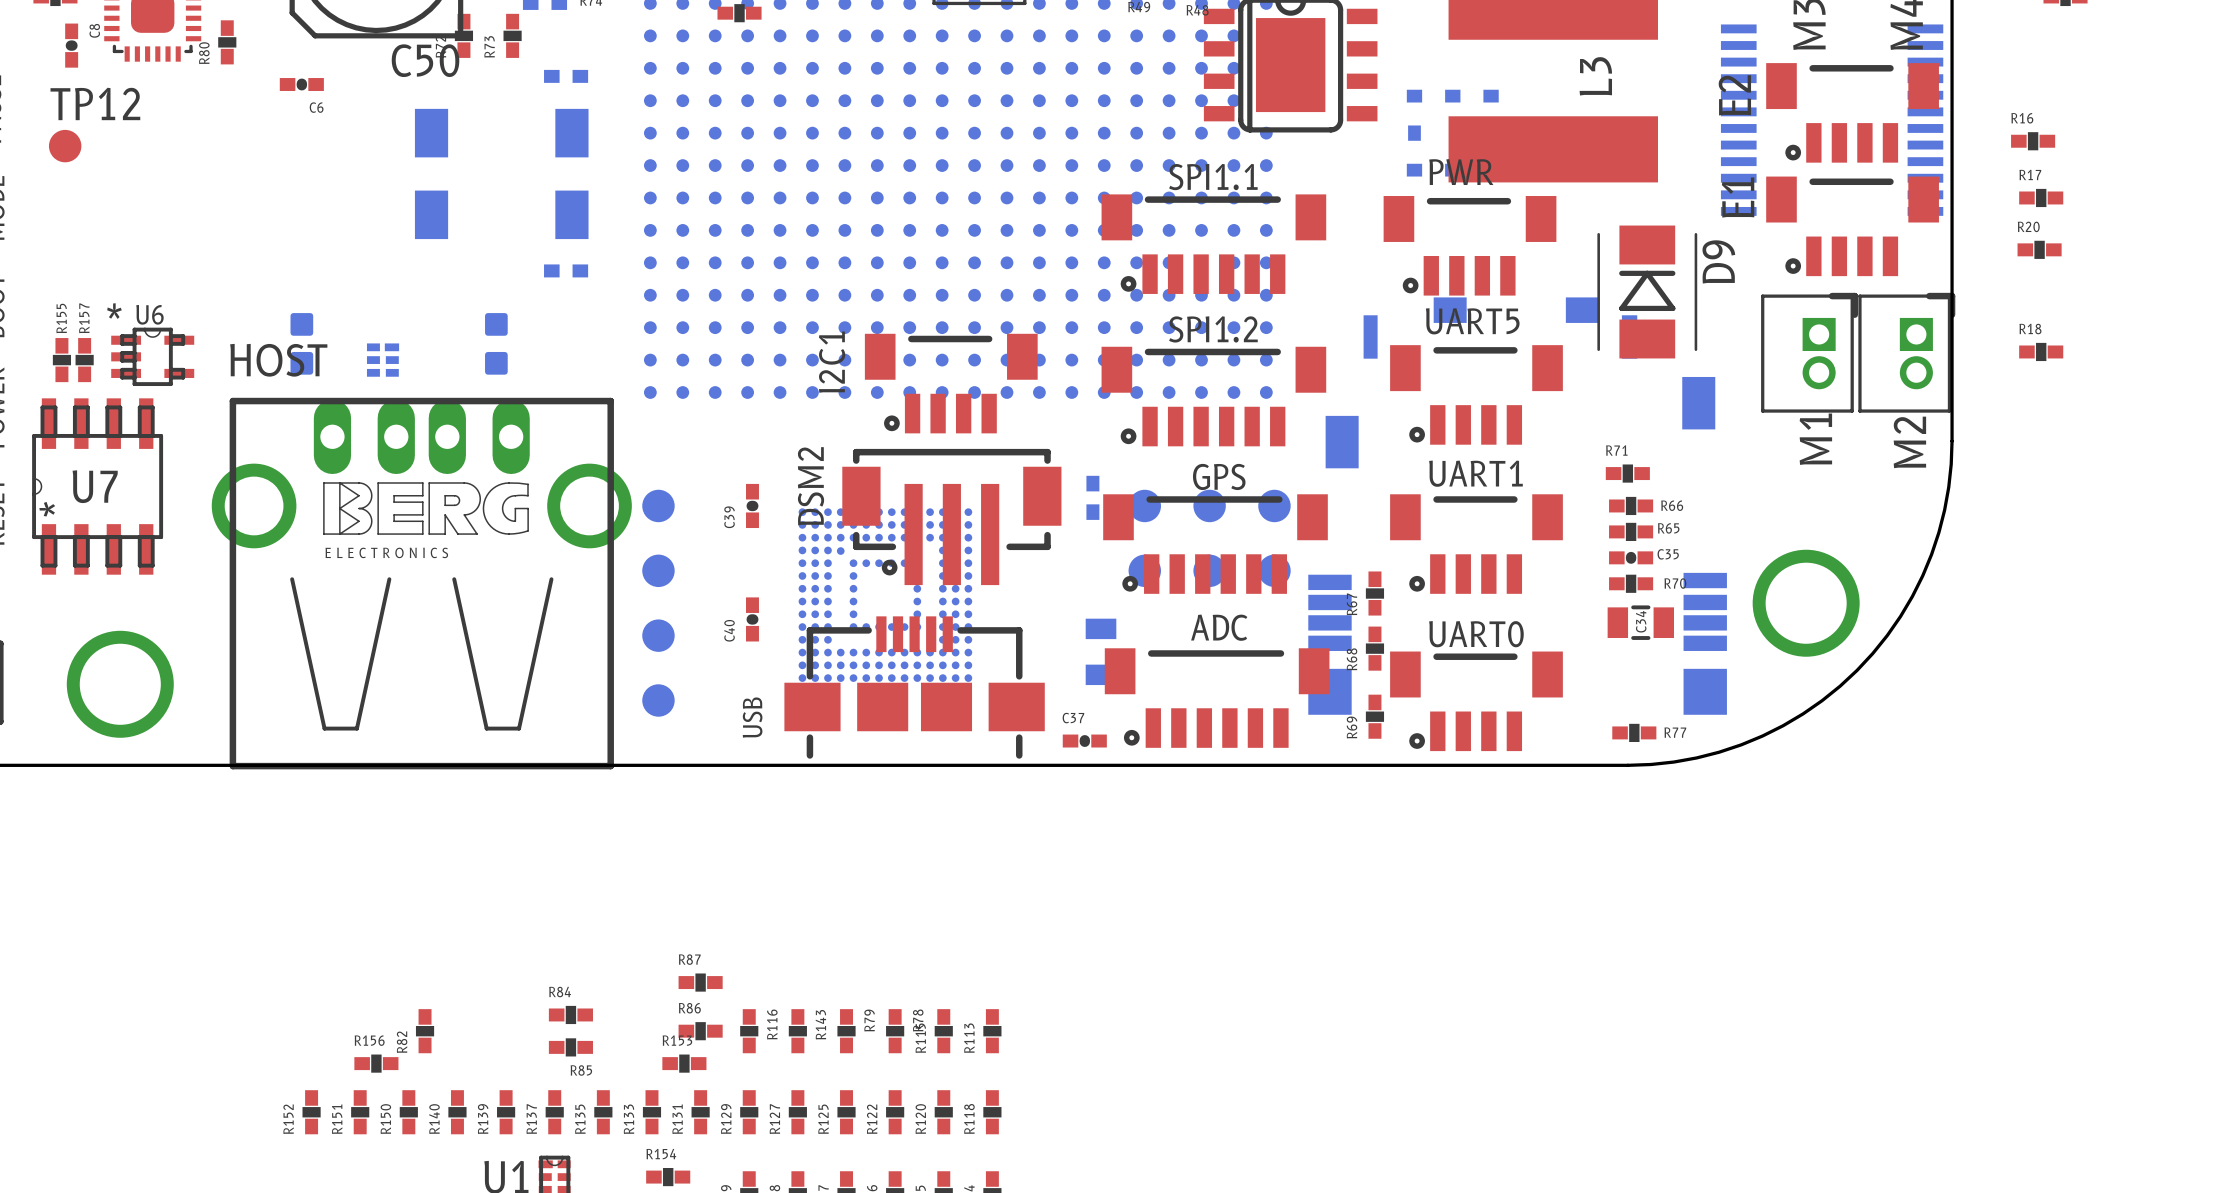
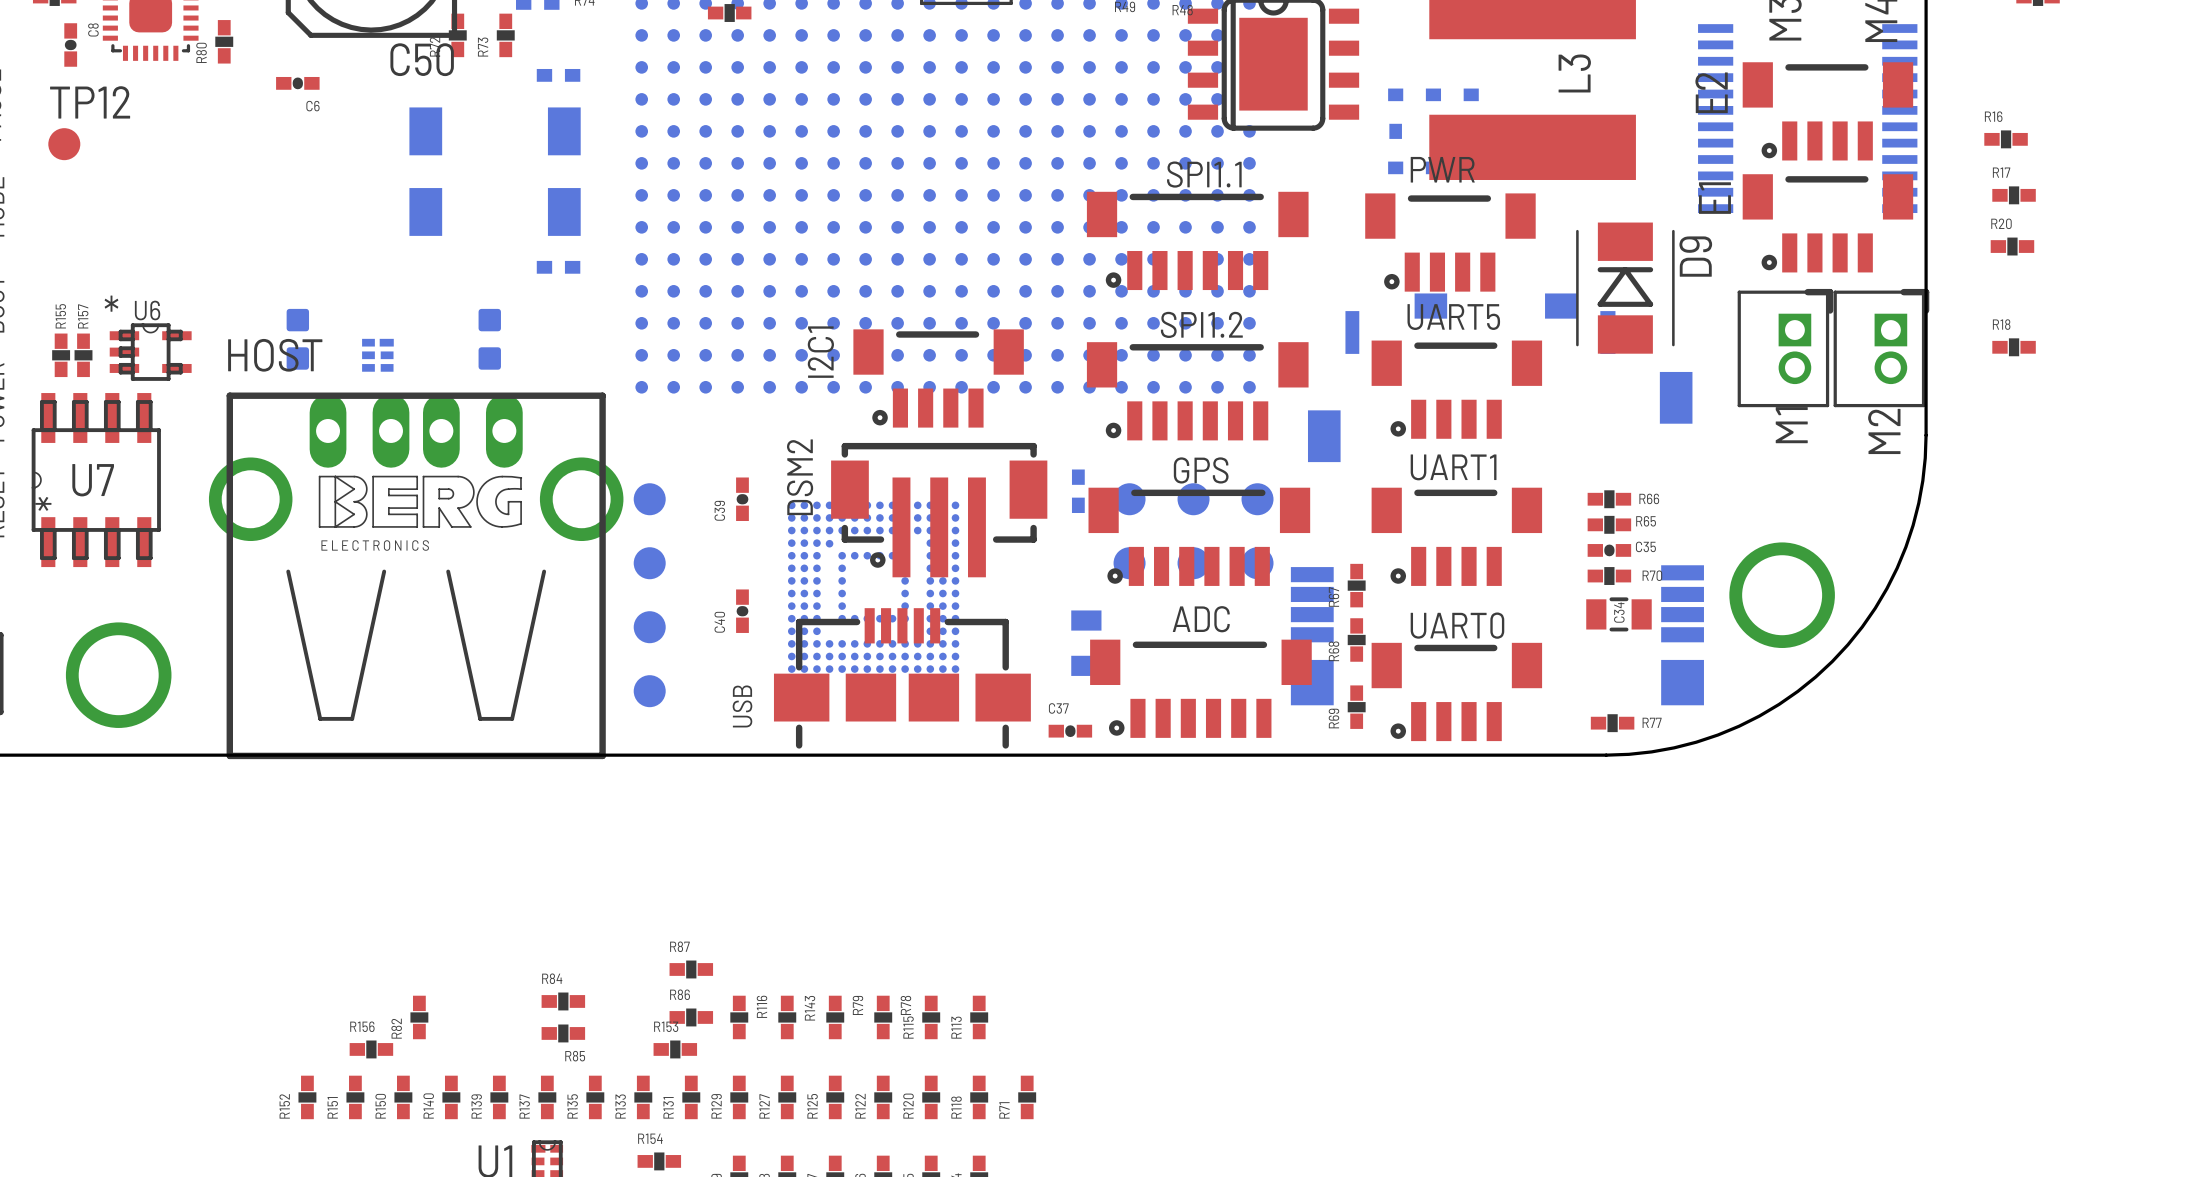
R71 rotation: 0° (1627, 473) -> 90° clockwise (1027, 1097)
R71 position: (1627, 473) -> (1027, 1097)

